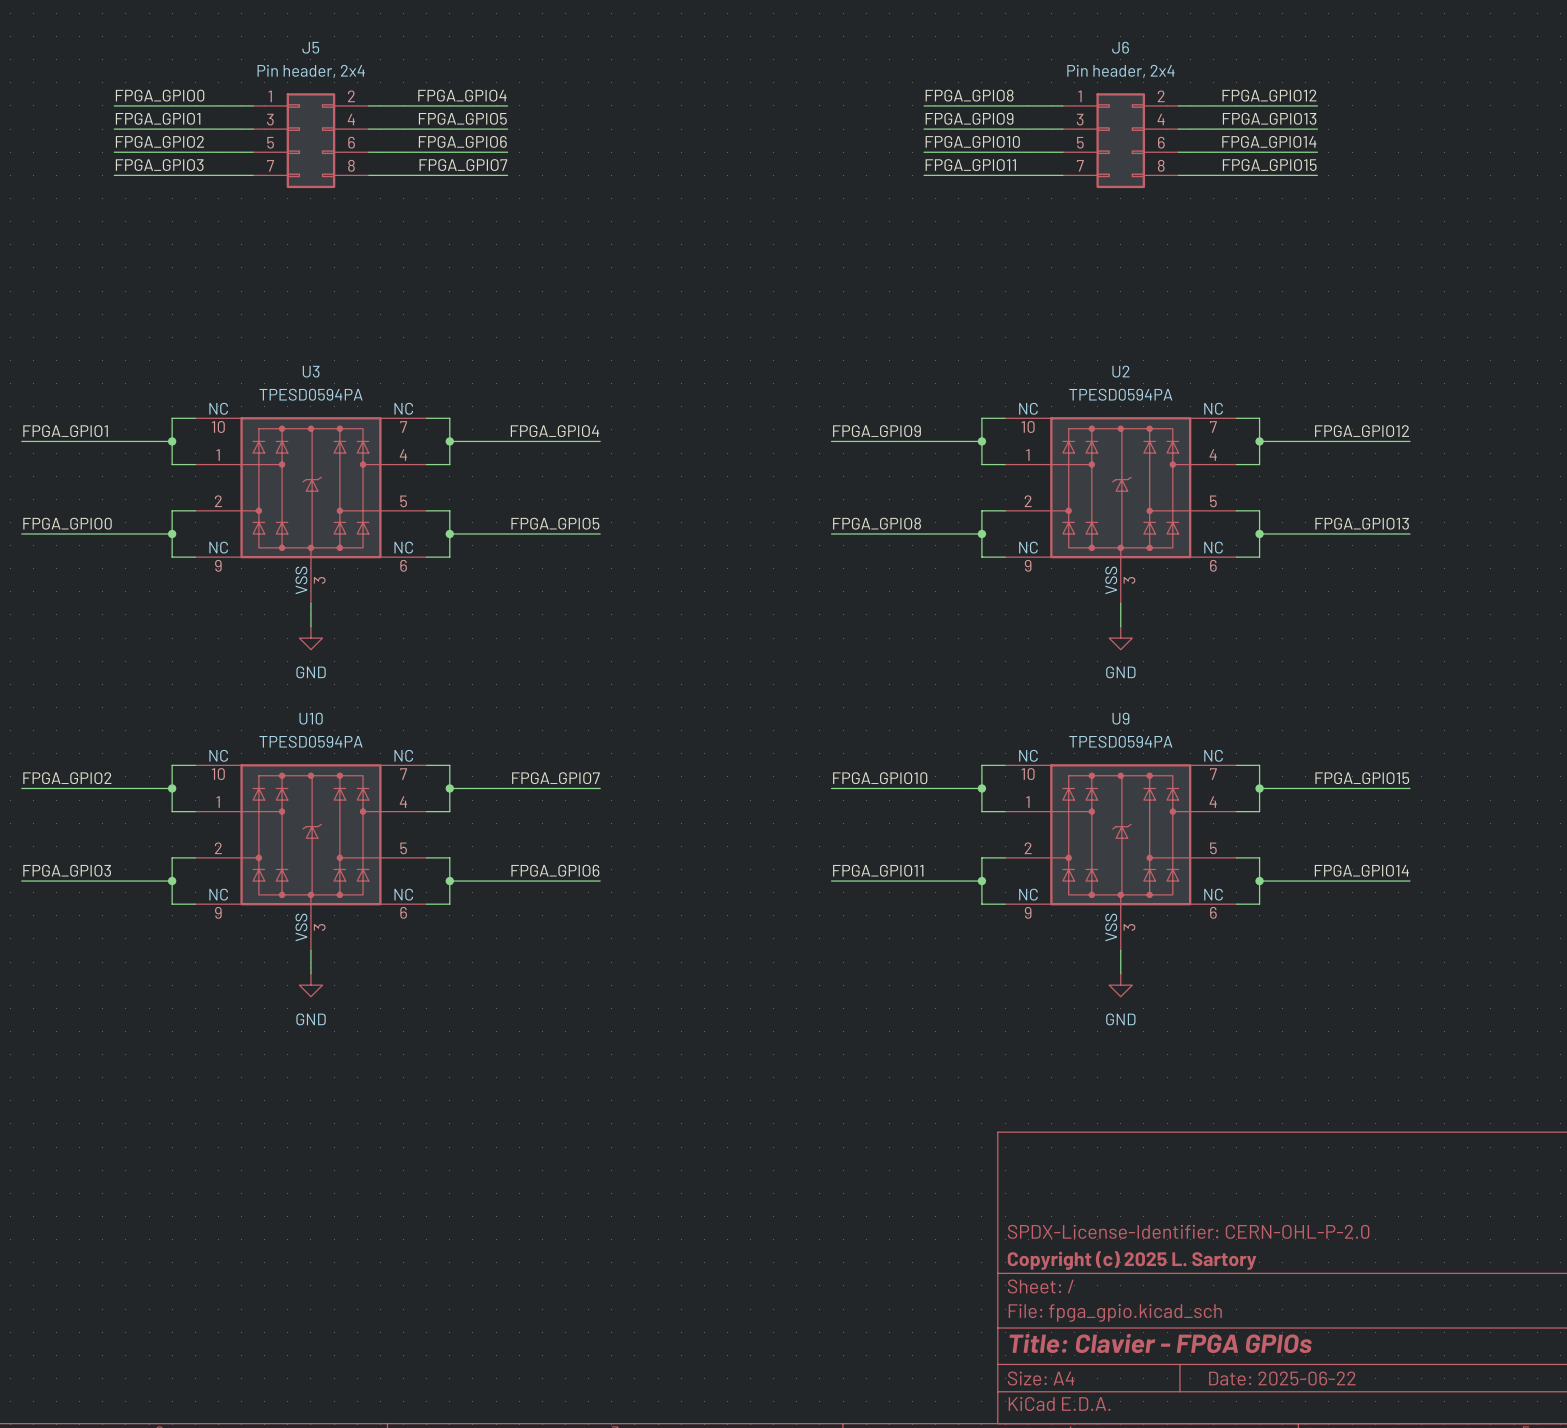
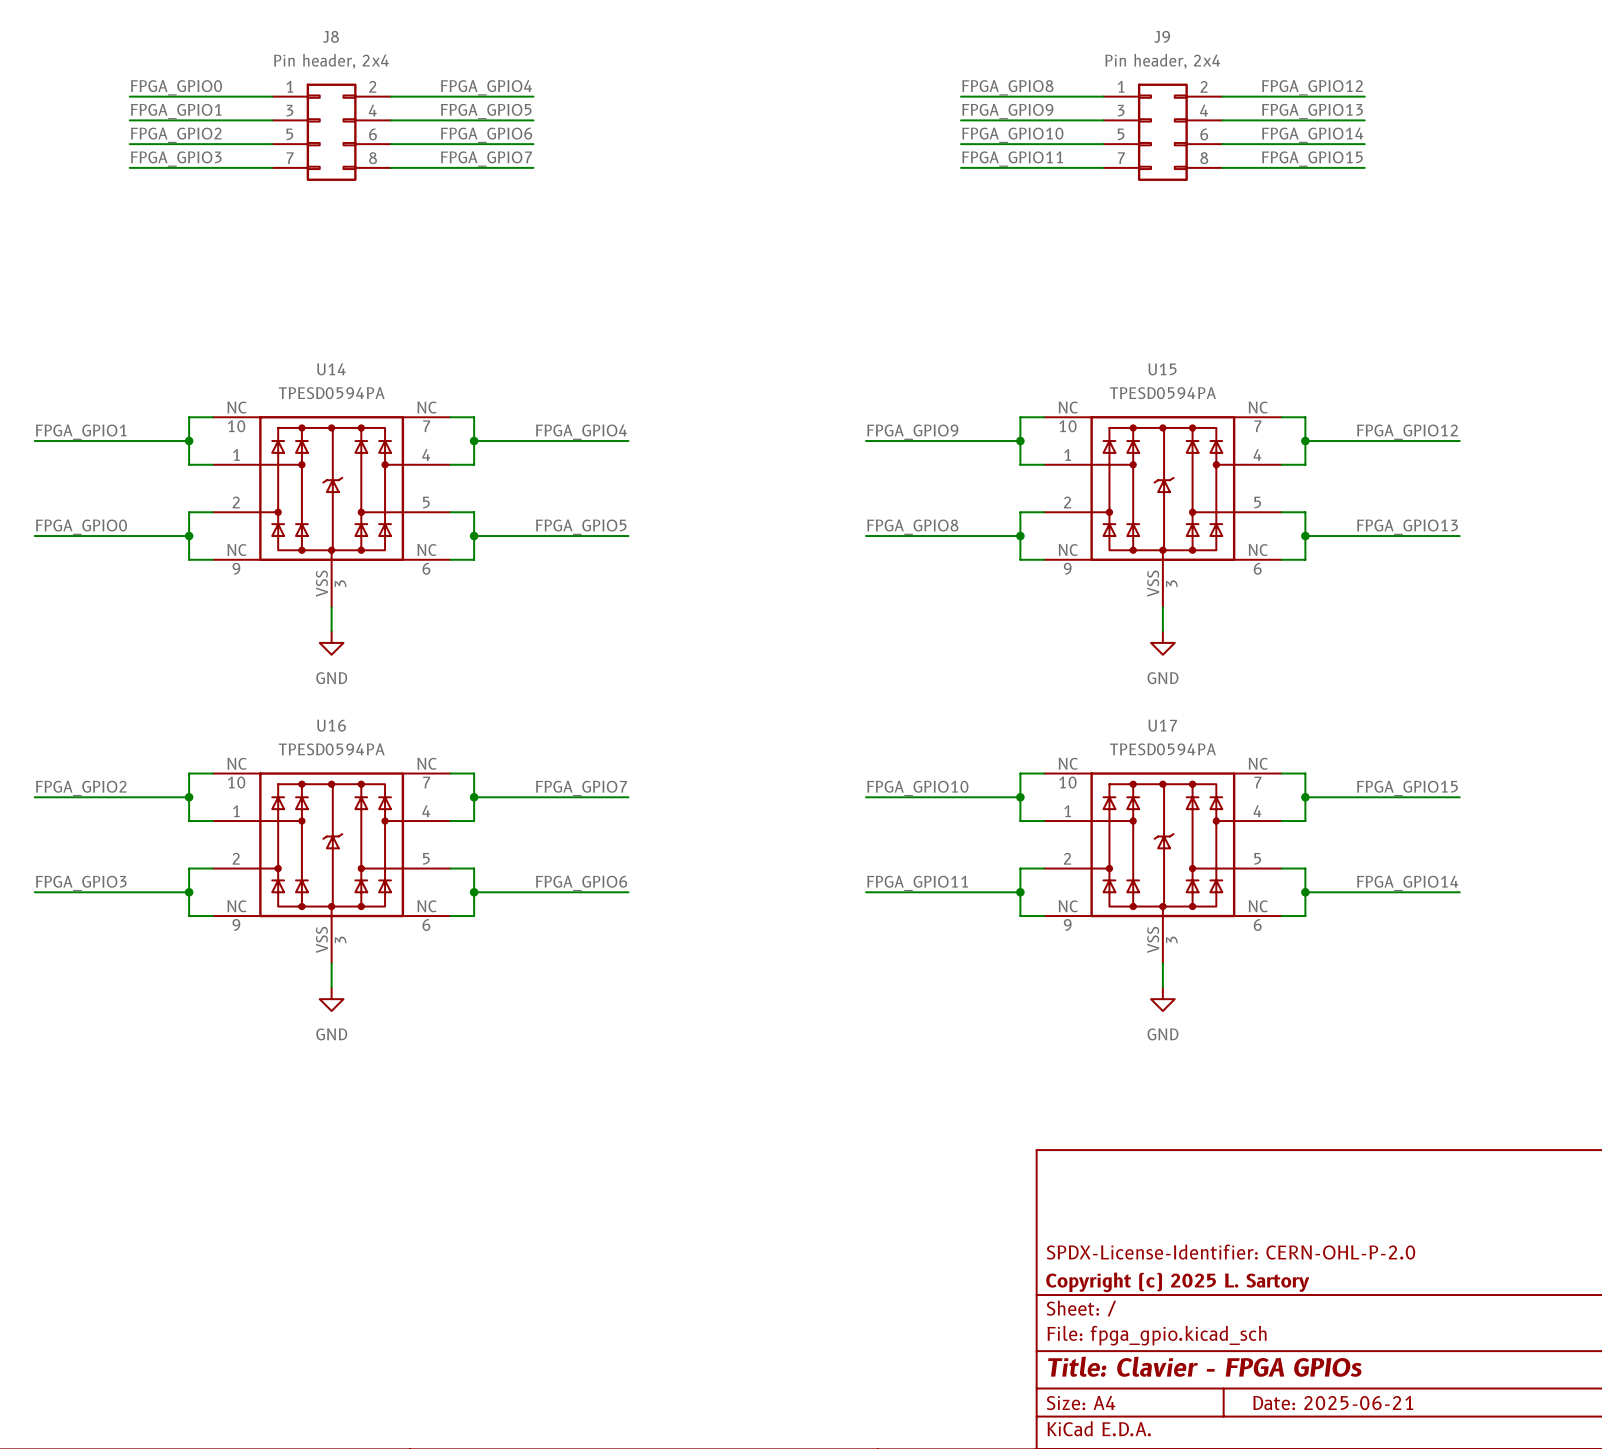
J5 name: J5 (310, 47) -> J8 (330, 36)
J6 name: J6 (1120, 47) -> J9 (1162, 36)
U3 name: U3 (311, 371) -> U14 (331, 369)
U2 name: U2 (1120, 371) -> U15 (1162, 369)
U10 name: U10 (311, 718) -> U16 (331, 725)
U9 name: U9 (1120, 718) -> U17 (1162, 725)
title block: Date: 2025-06-22 (1282, 1378) -> Date: 2025-06-21 (1333, 1403)

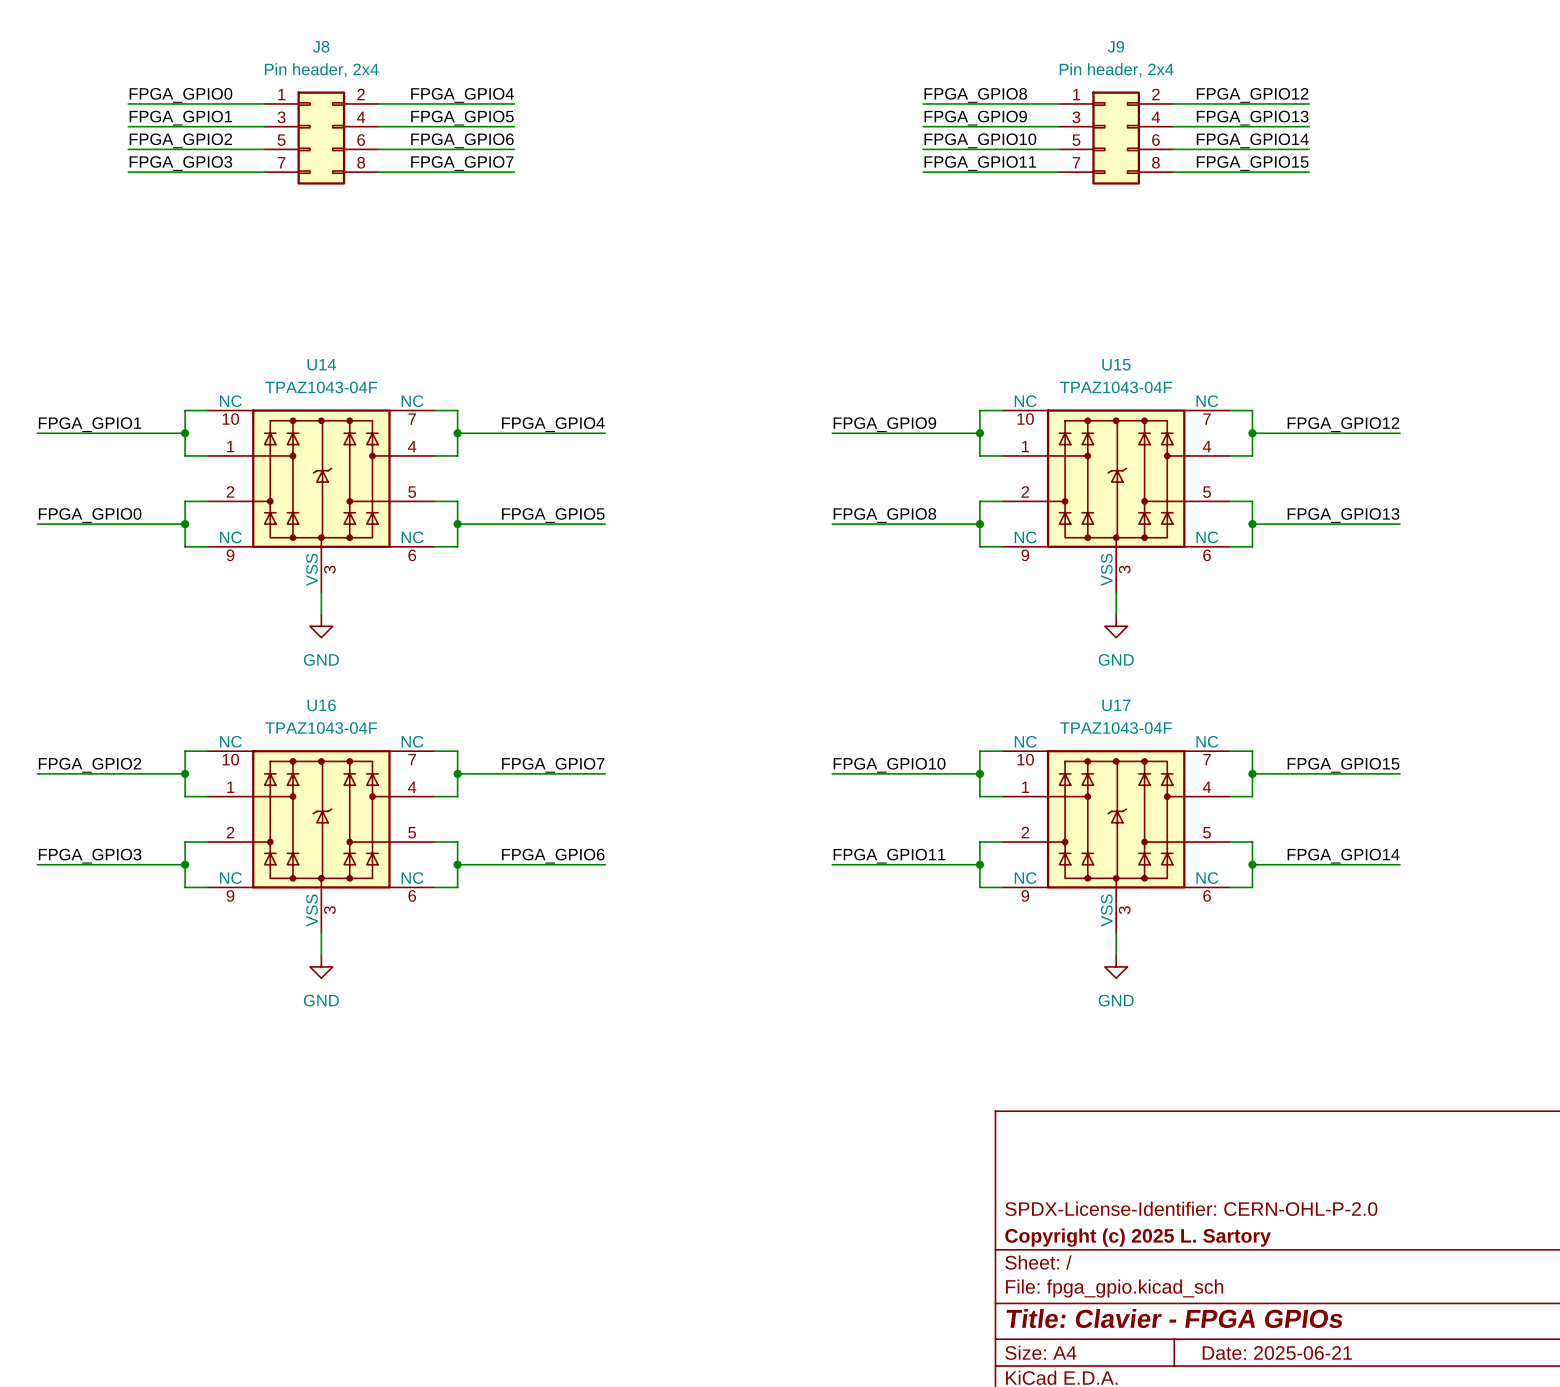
U14 value: TPESD0594PA (331, 393) -> TPAZ1043-04F (321, 387)
U15 value: TPESD0594PA (1162, 393) -> TPAZ1043-04F (1116, 387)
U16 value: TPESD0594PA (331, 749) -> TPAZ1043-04F (321, 728)
U17 value: TPESD0594PA (1162, 749) -> TPAZ1043-04F (1116, 728)

